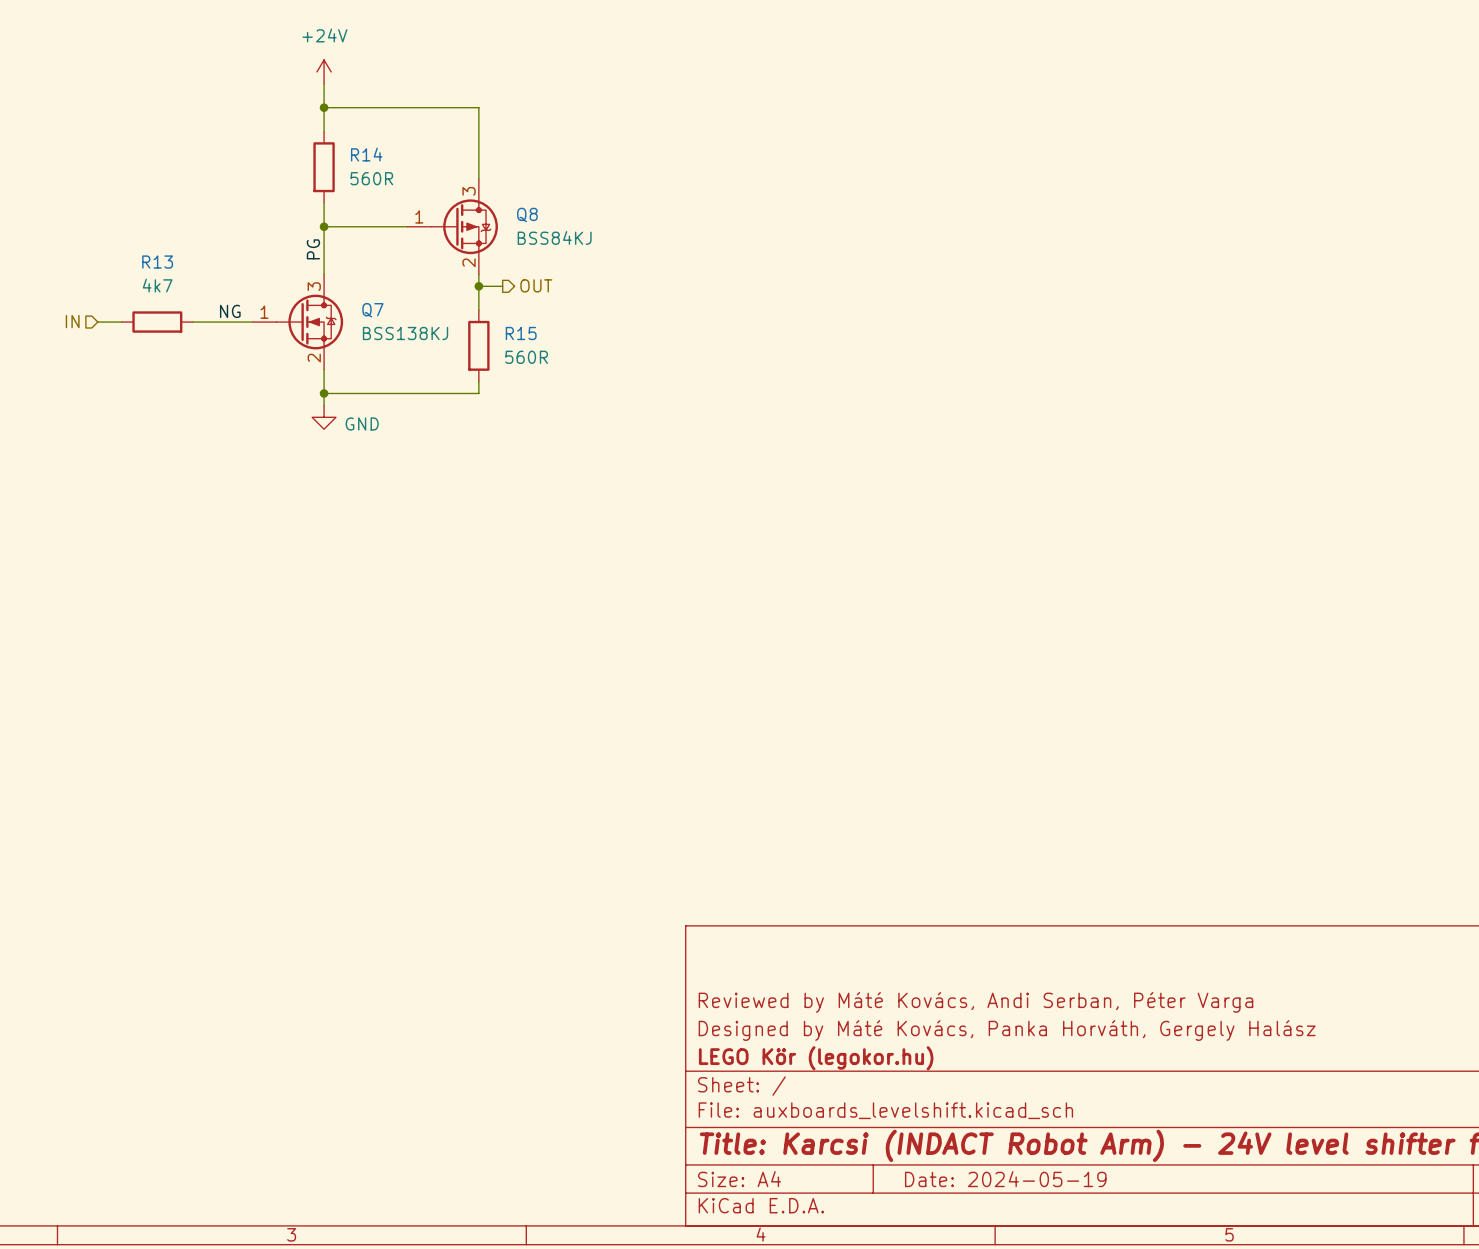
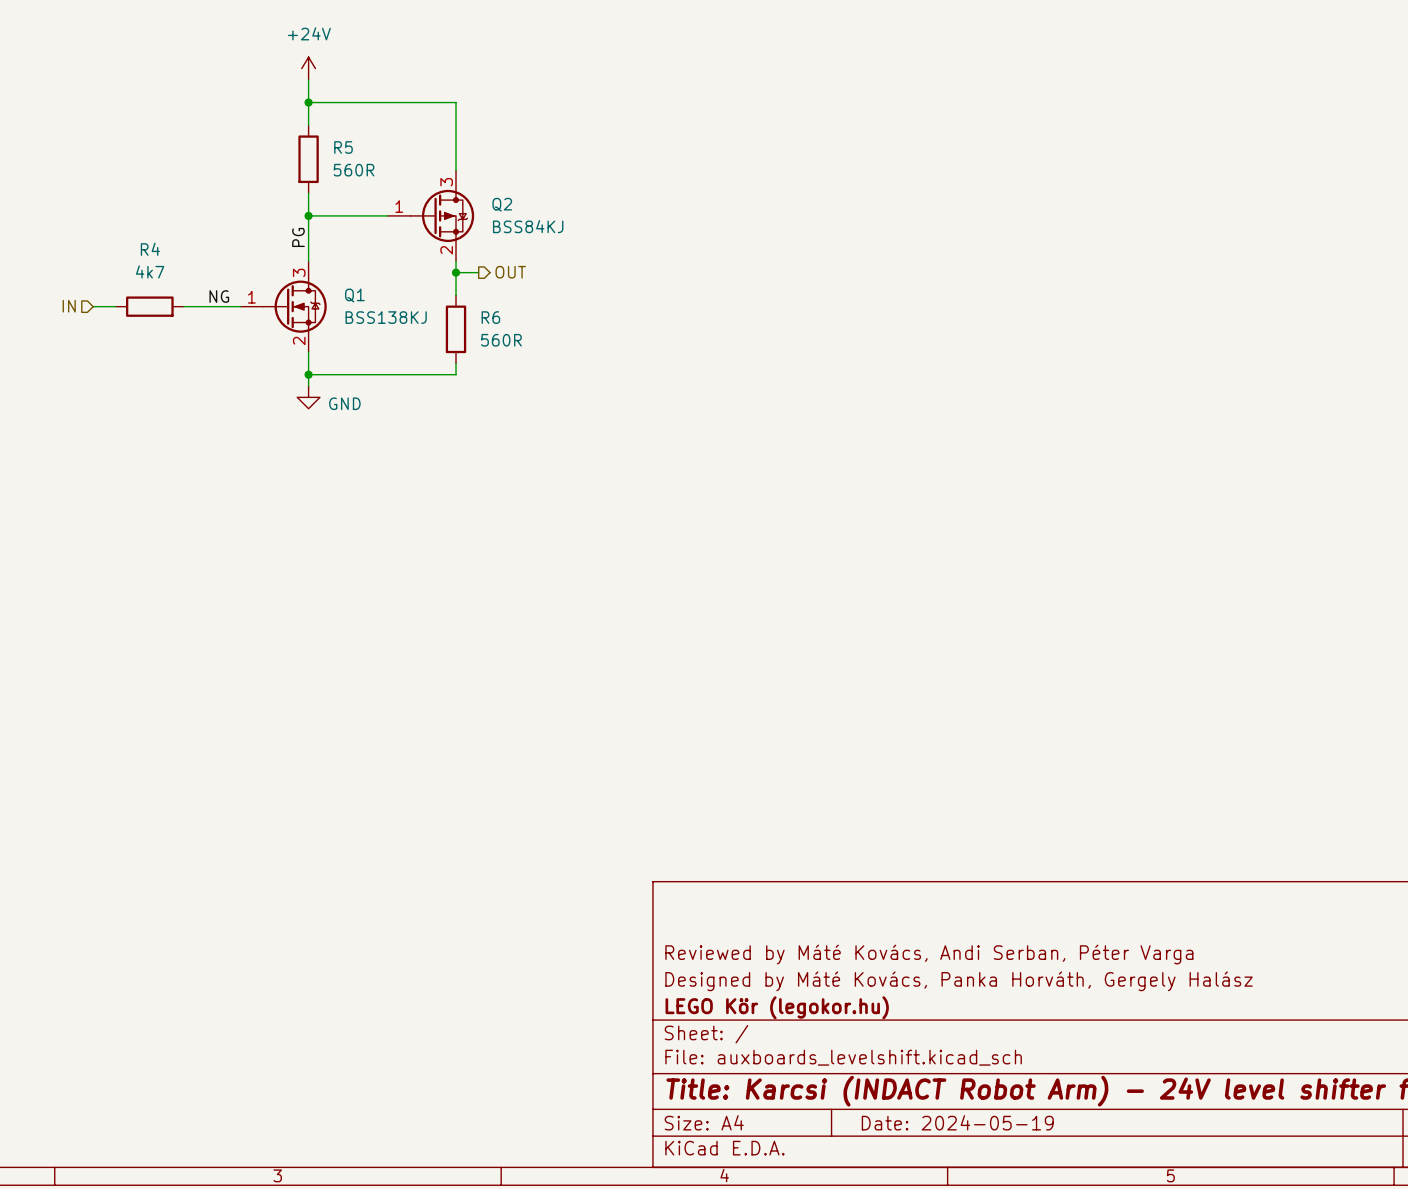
R14 name: R14 (366, 154) -> R5 (343, 147)
Q8 name: Q8 (527, 214) -> Q2 (502, 204)
R13 name: R13 (157, 262) -> R4 (150, 249)
Q7 name: Q7 (372, 310) -> Q1 (354, 295)
R15 name: R15 (521, 333) -> R6 (490, 317)

